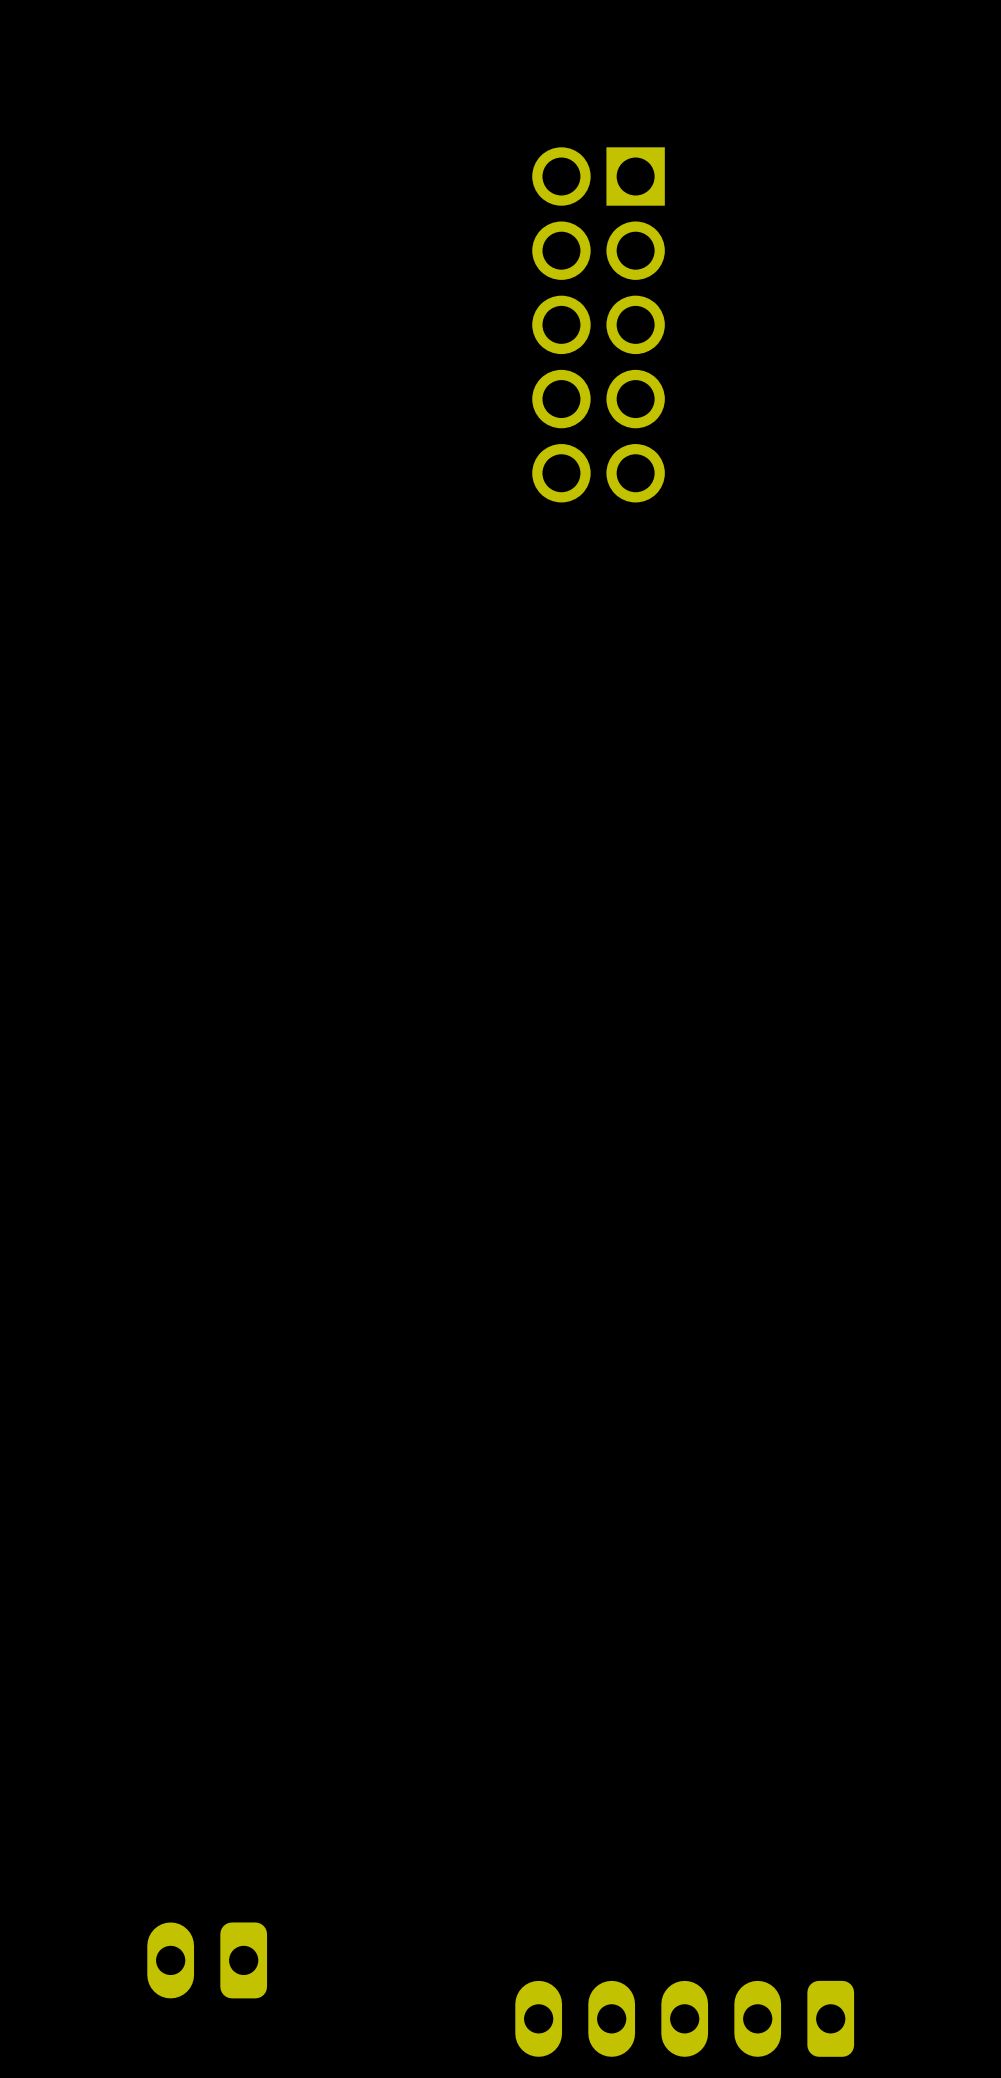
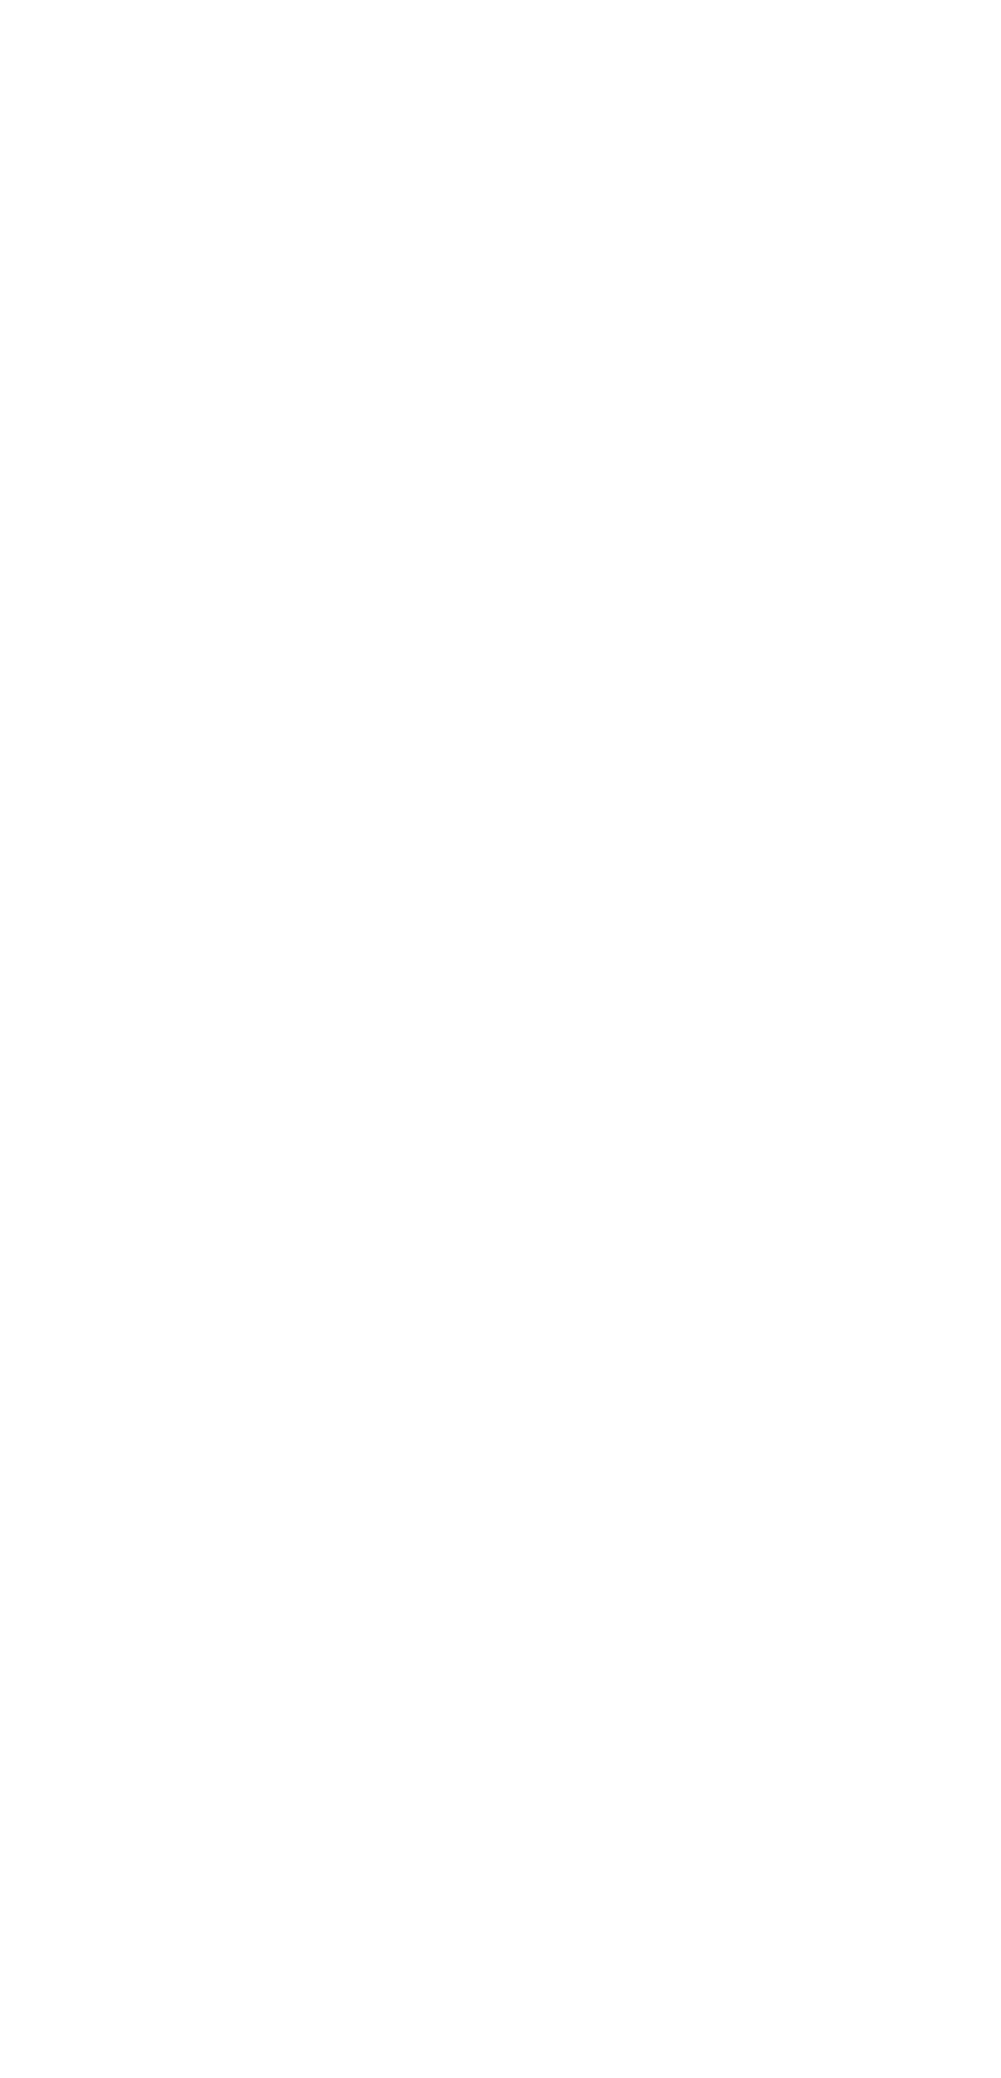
part: (598, 324) -> none
part: (207, 1960) -> none
part: (684, 2018) -> none

